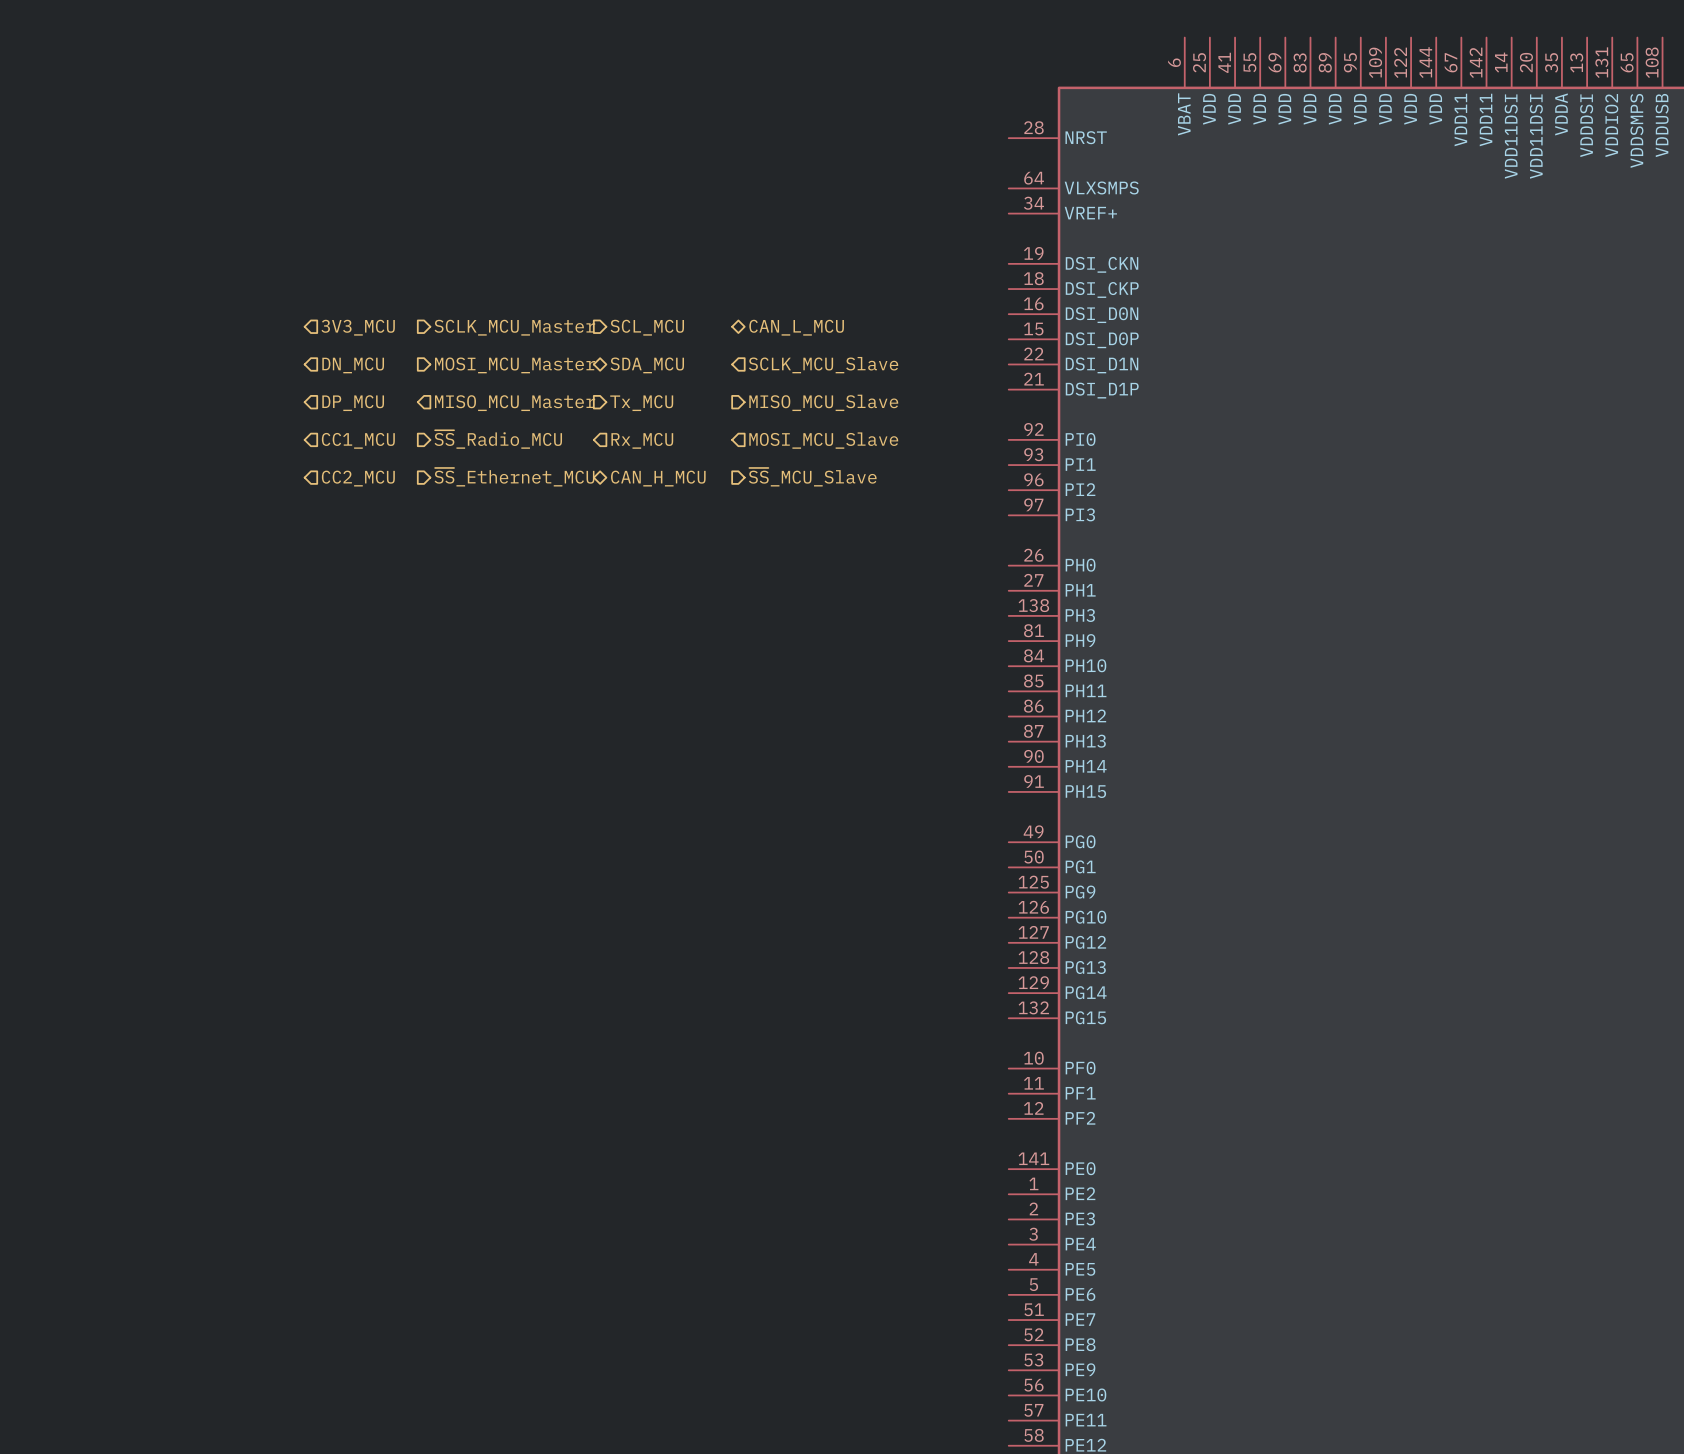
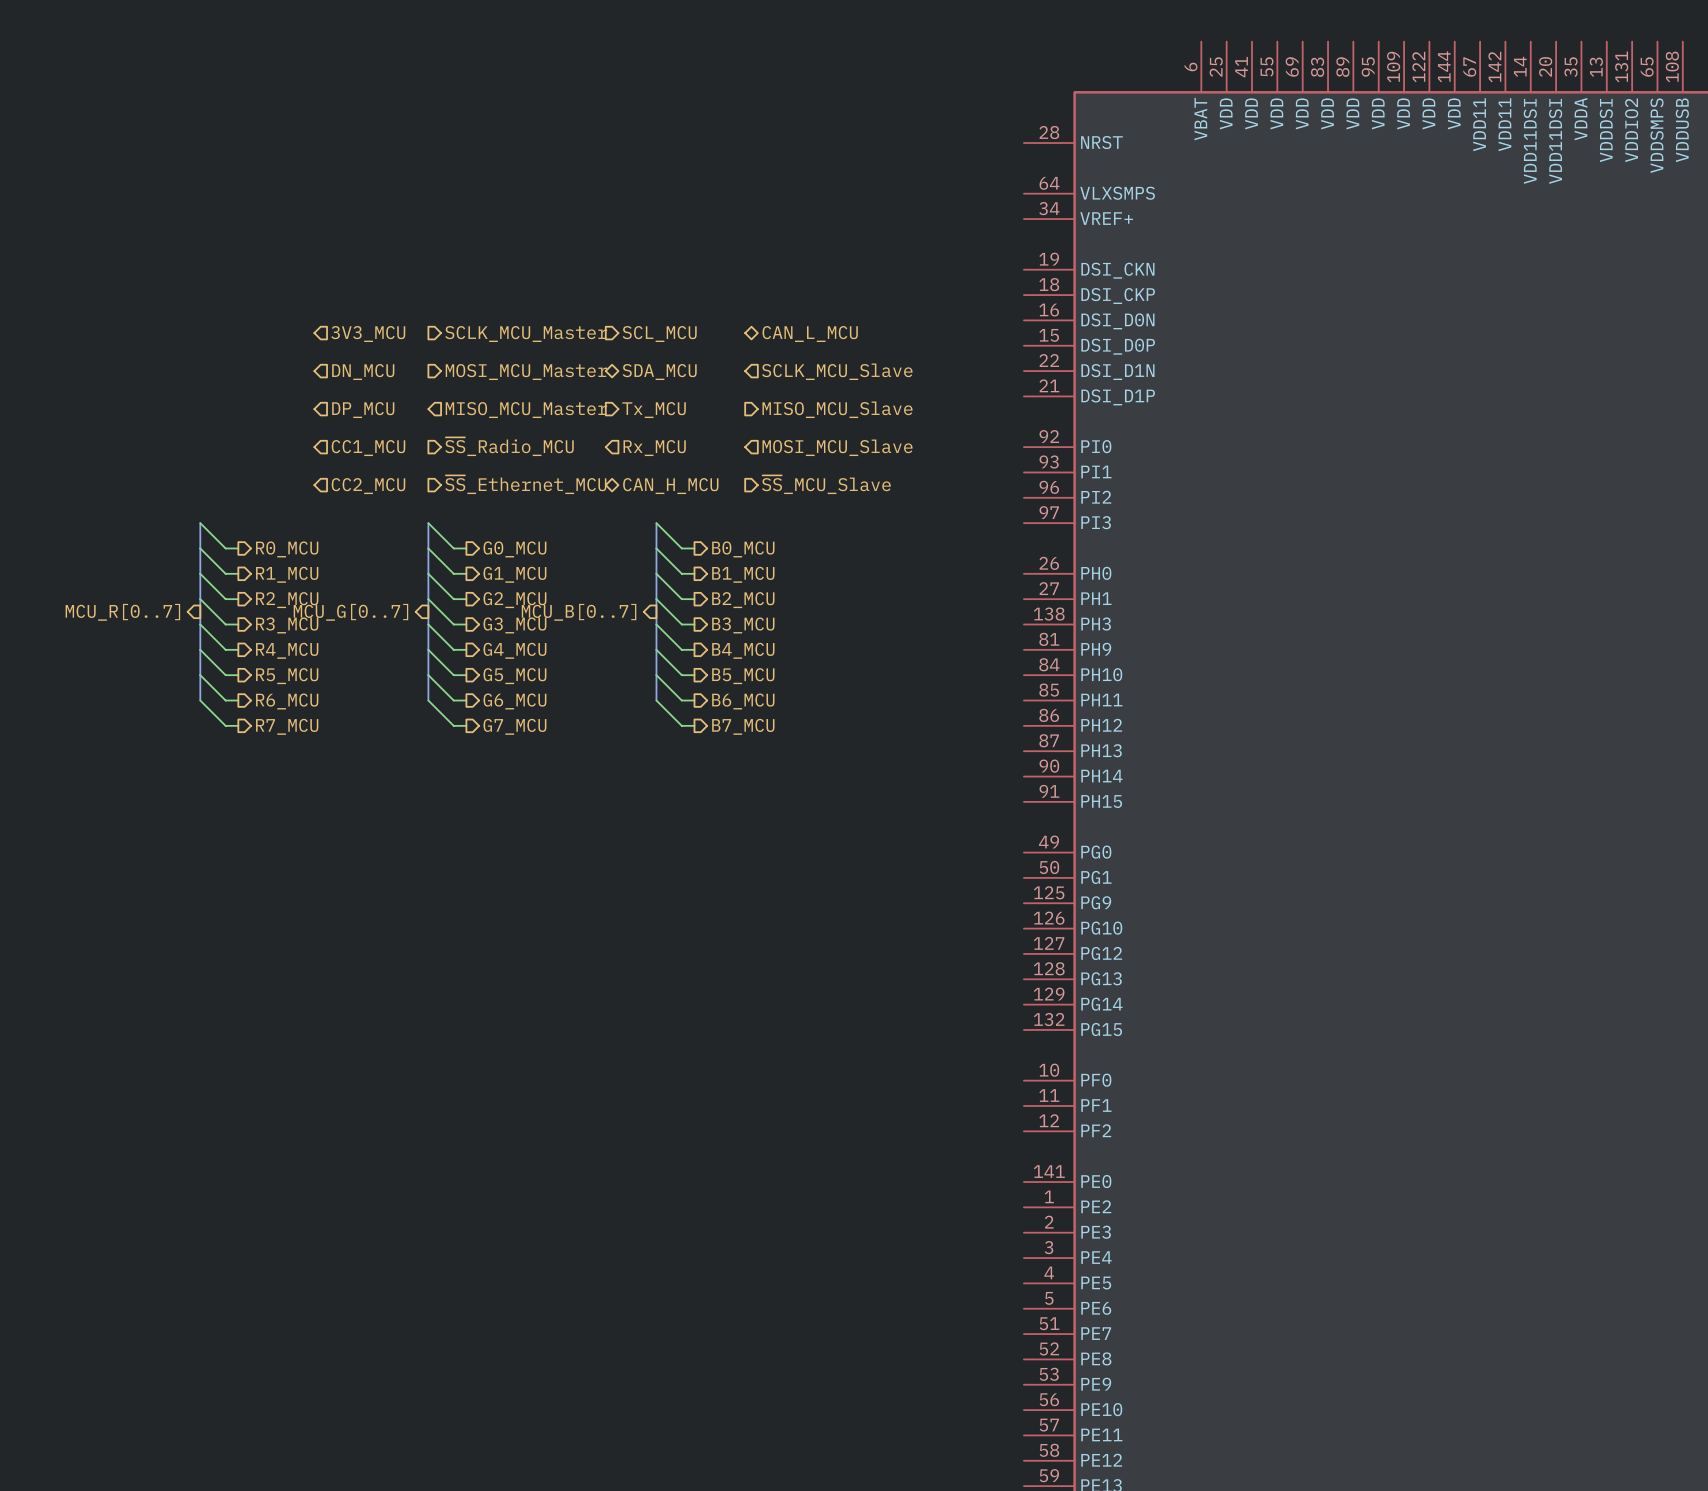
wire: none -> (200, 523) (225, 548) (238, 548)
bus: none -> (200, 523) (200, 700)
wire: none -> (428, 523) (453, 548) (466, 548)
bus: none -> (428, 523) (428, 700)
wire: none -> (656, 523) (681, 548) (694, 548)
bus: none -> (656, 523) (656, 700)
wire: none -> (200, 548) (225, 573) (238, 573)
wire: none -> (428, 548) (453, 573) (466, 573)
wire: none -> (656, 548) (681, 573) (694, 573)
hierarchical label: none -> R0_MCU (287, 549)
hierarchical label: none -> G0_MCU (514, 549)
hierarchical label: none -> B0_MCU (743, 549)
wire: none -> (200, 573) (225, 599) (238, 599)
wire: none -> (428, 573) (453, 599) (466, 599)
wire: none -> (656, 573) (681, 599) (694, 599)
hierarchical label: none -> R1_MCU (287, 574)
hierarchical label: none -> G1_MCU (514, 574)
hierarchical label: none -> B1_MCU (743, 574)
wire: none -> (200, 599) (225, 624) (238, 624)
wire: none -> (428, 599) (453, 624) (466, 624)
wire: none -> (656, 599) (681, 624) (694, 624)
hierarchical label: none -> R2_MCU (287, 600)
hierarchical label: none -> G2_MCU (514, 600)
hierarchical label: none -> B2_MCU (743, 600)
hierarchical label: none -> MCU_R[0..7] (122, 612)
hierarchical label: none -> MCU_G[0..7] (350, 612)
hierarchical label: none -> MCU_B[0..7] (579, 612)
wire: none -> (200, 624) (225, 649) (238, 649)
wire: none -> (428, 624) (453, 649) (466, 649)
wire: none -> (656, 624) (681, 649) (694, 649)
hierarchical label: none -> R3_MCU (287, 625)
hierarchical label: none -> G3_MCU (514, 625)
hierarchical label: none -> B3_MCU (743, 625)
wire: none -> (200, 649) (225, 675) (238, 675)
wire: none -> (428, 649) (453, 675) (466, 675)
wire: none -> (656, 649) (681, 675) (694, 675)
hierarchical label: none -> R4_MCU (287, 650)
hierarchical label: none -> G4_MCU (514, 650)
hierarchical label: none -> B4_MCU (743, 650)
wire: none -> (200, 675) (225, 700) (238, 700)
wire: none -> (428, 675) (453, 700) (466, 700)
wire: none -> (656, 675) (681, 700) (694, 700)
hierarchical label: none -> R5_MCU (287, 676)
hierarchical label: none -> G5_MCU (514, 676)
hierarchical label: none -> B5_MCU (743, 676)
wire: none -> (200, 700) (225, 725) (238, 725)
wire: none -> (428, 700) (453, 725) (466, 725)
wire: none -> (656, 700) (681, 725) (694, 725)
hierarchical label: none -> R6_MCU (287, 701)
hierarchical label: none -> G6_MCU (514, 701)
hierarchical label: none -> B6_MCU (743, 701)
hierarchical label: none -> R7_MCU (287, 726)
hierarchical label: none -> G7_MCU (514, 726)
hierarchical label: none -> B7_MCU (743, 726)

